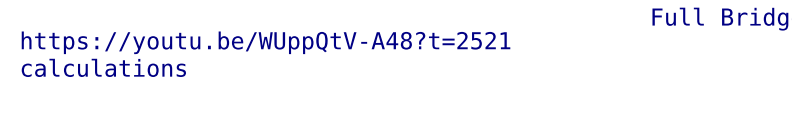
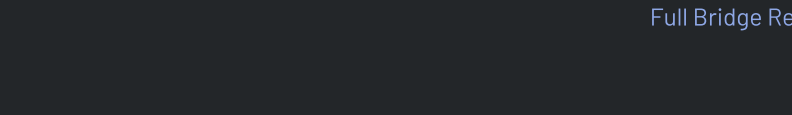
text: https://youtu.be/WUppQtV-A48?t=2521 (266, 42) -> none
text: calculations (103, 67) -> none

